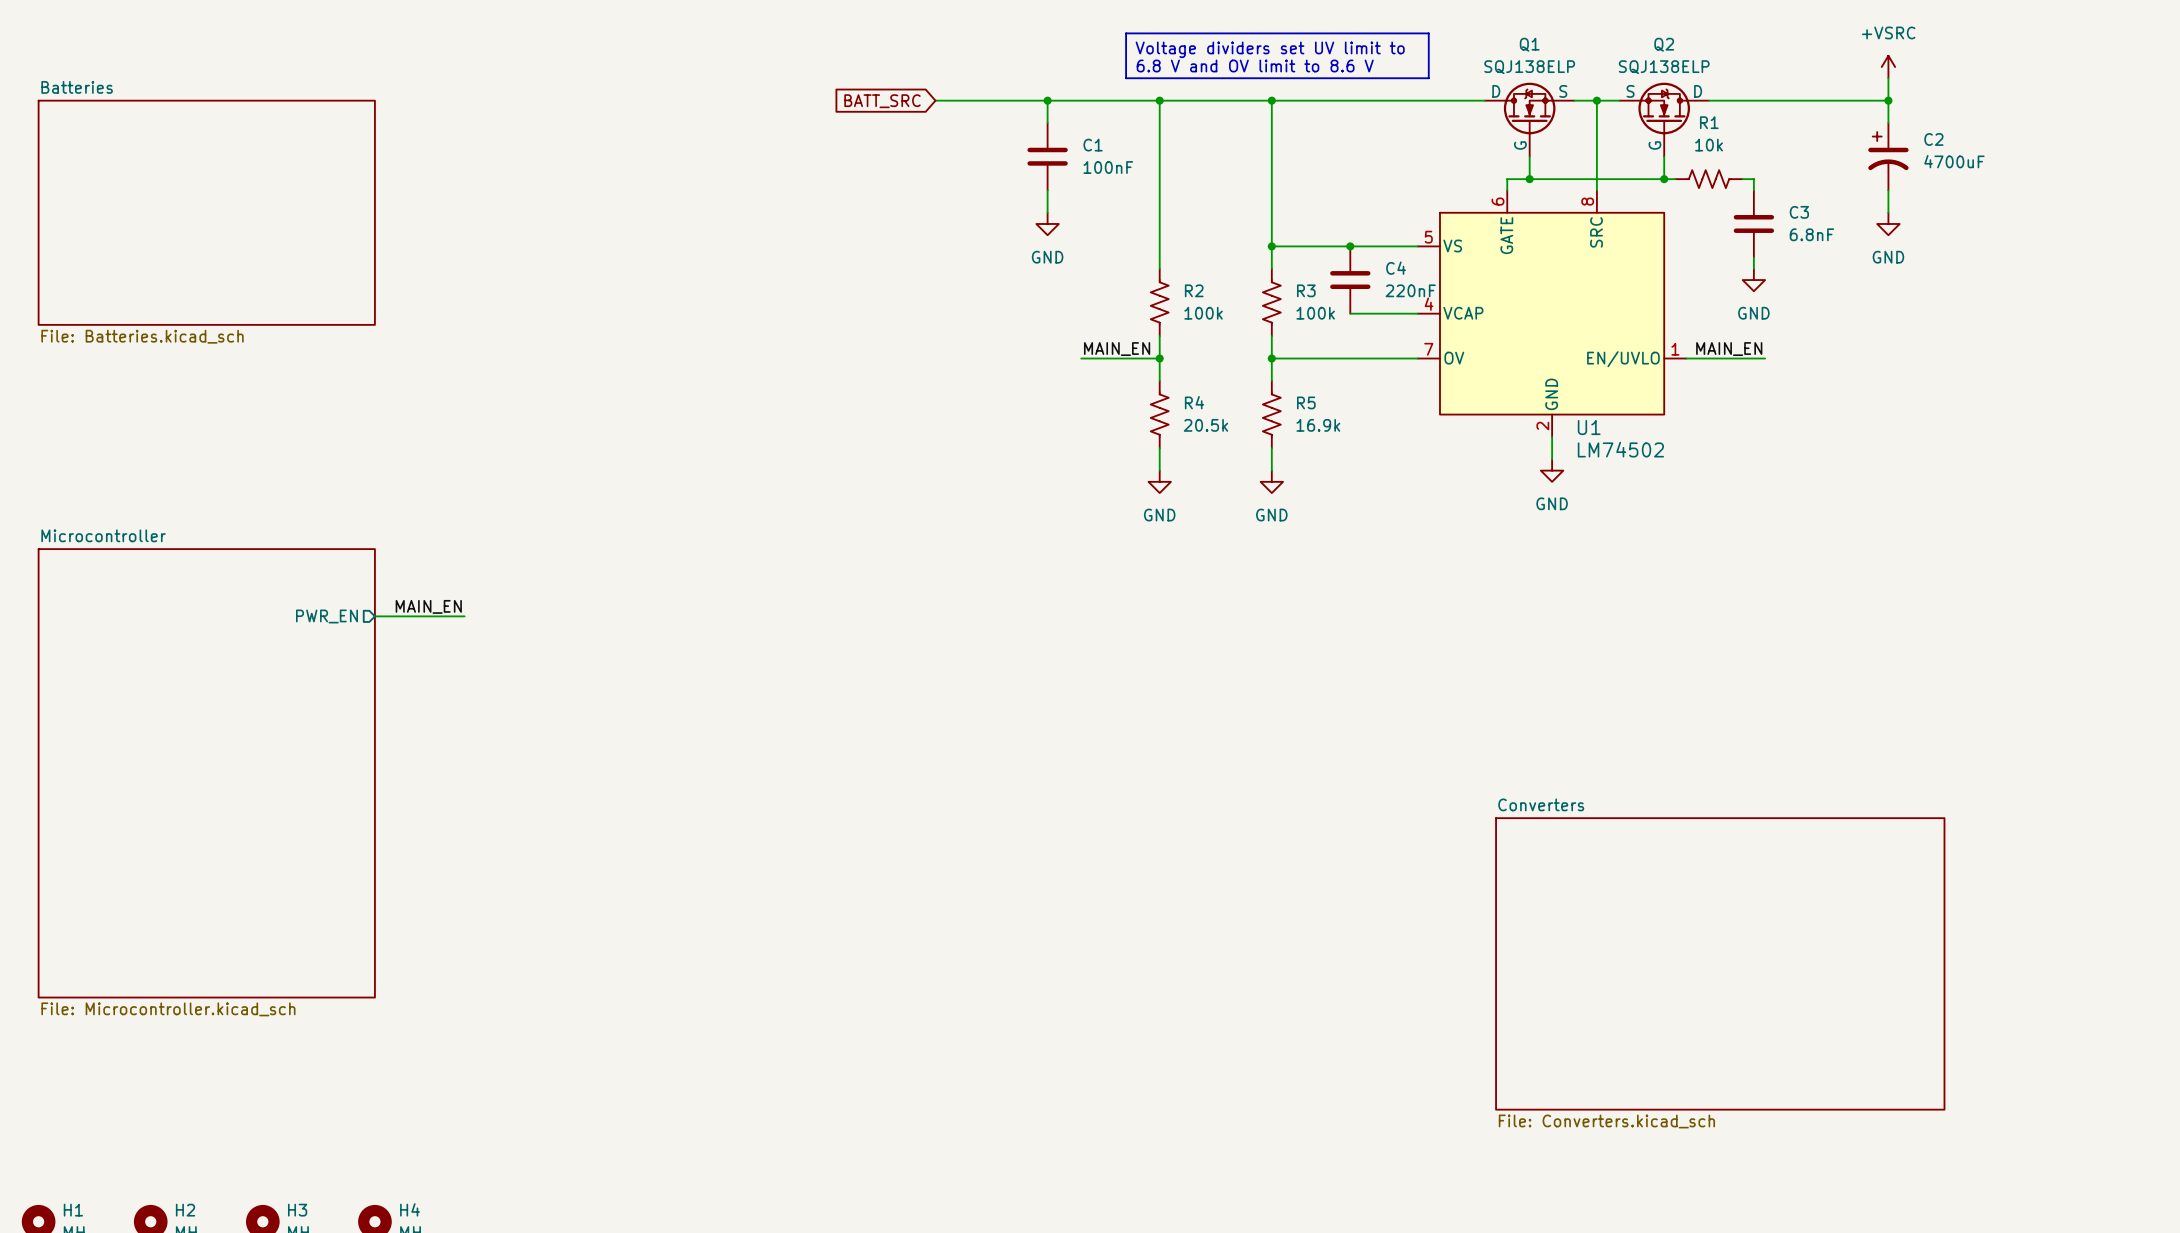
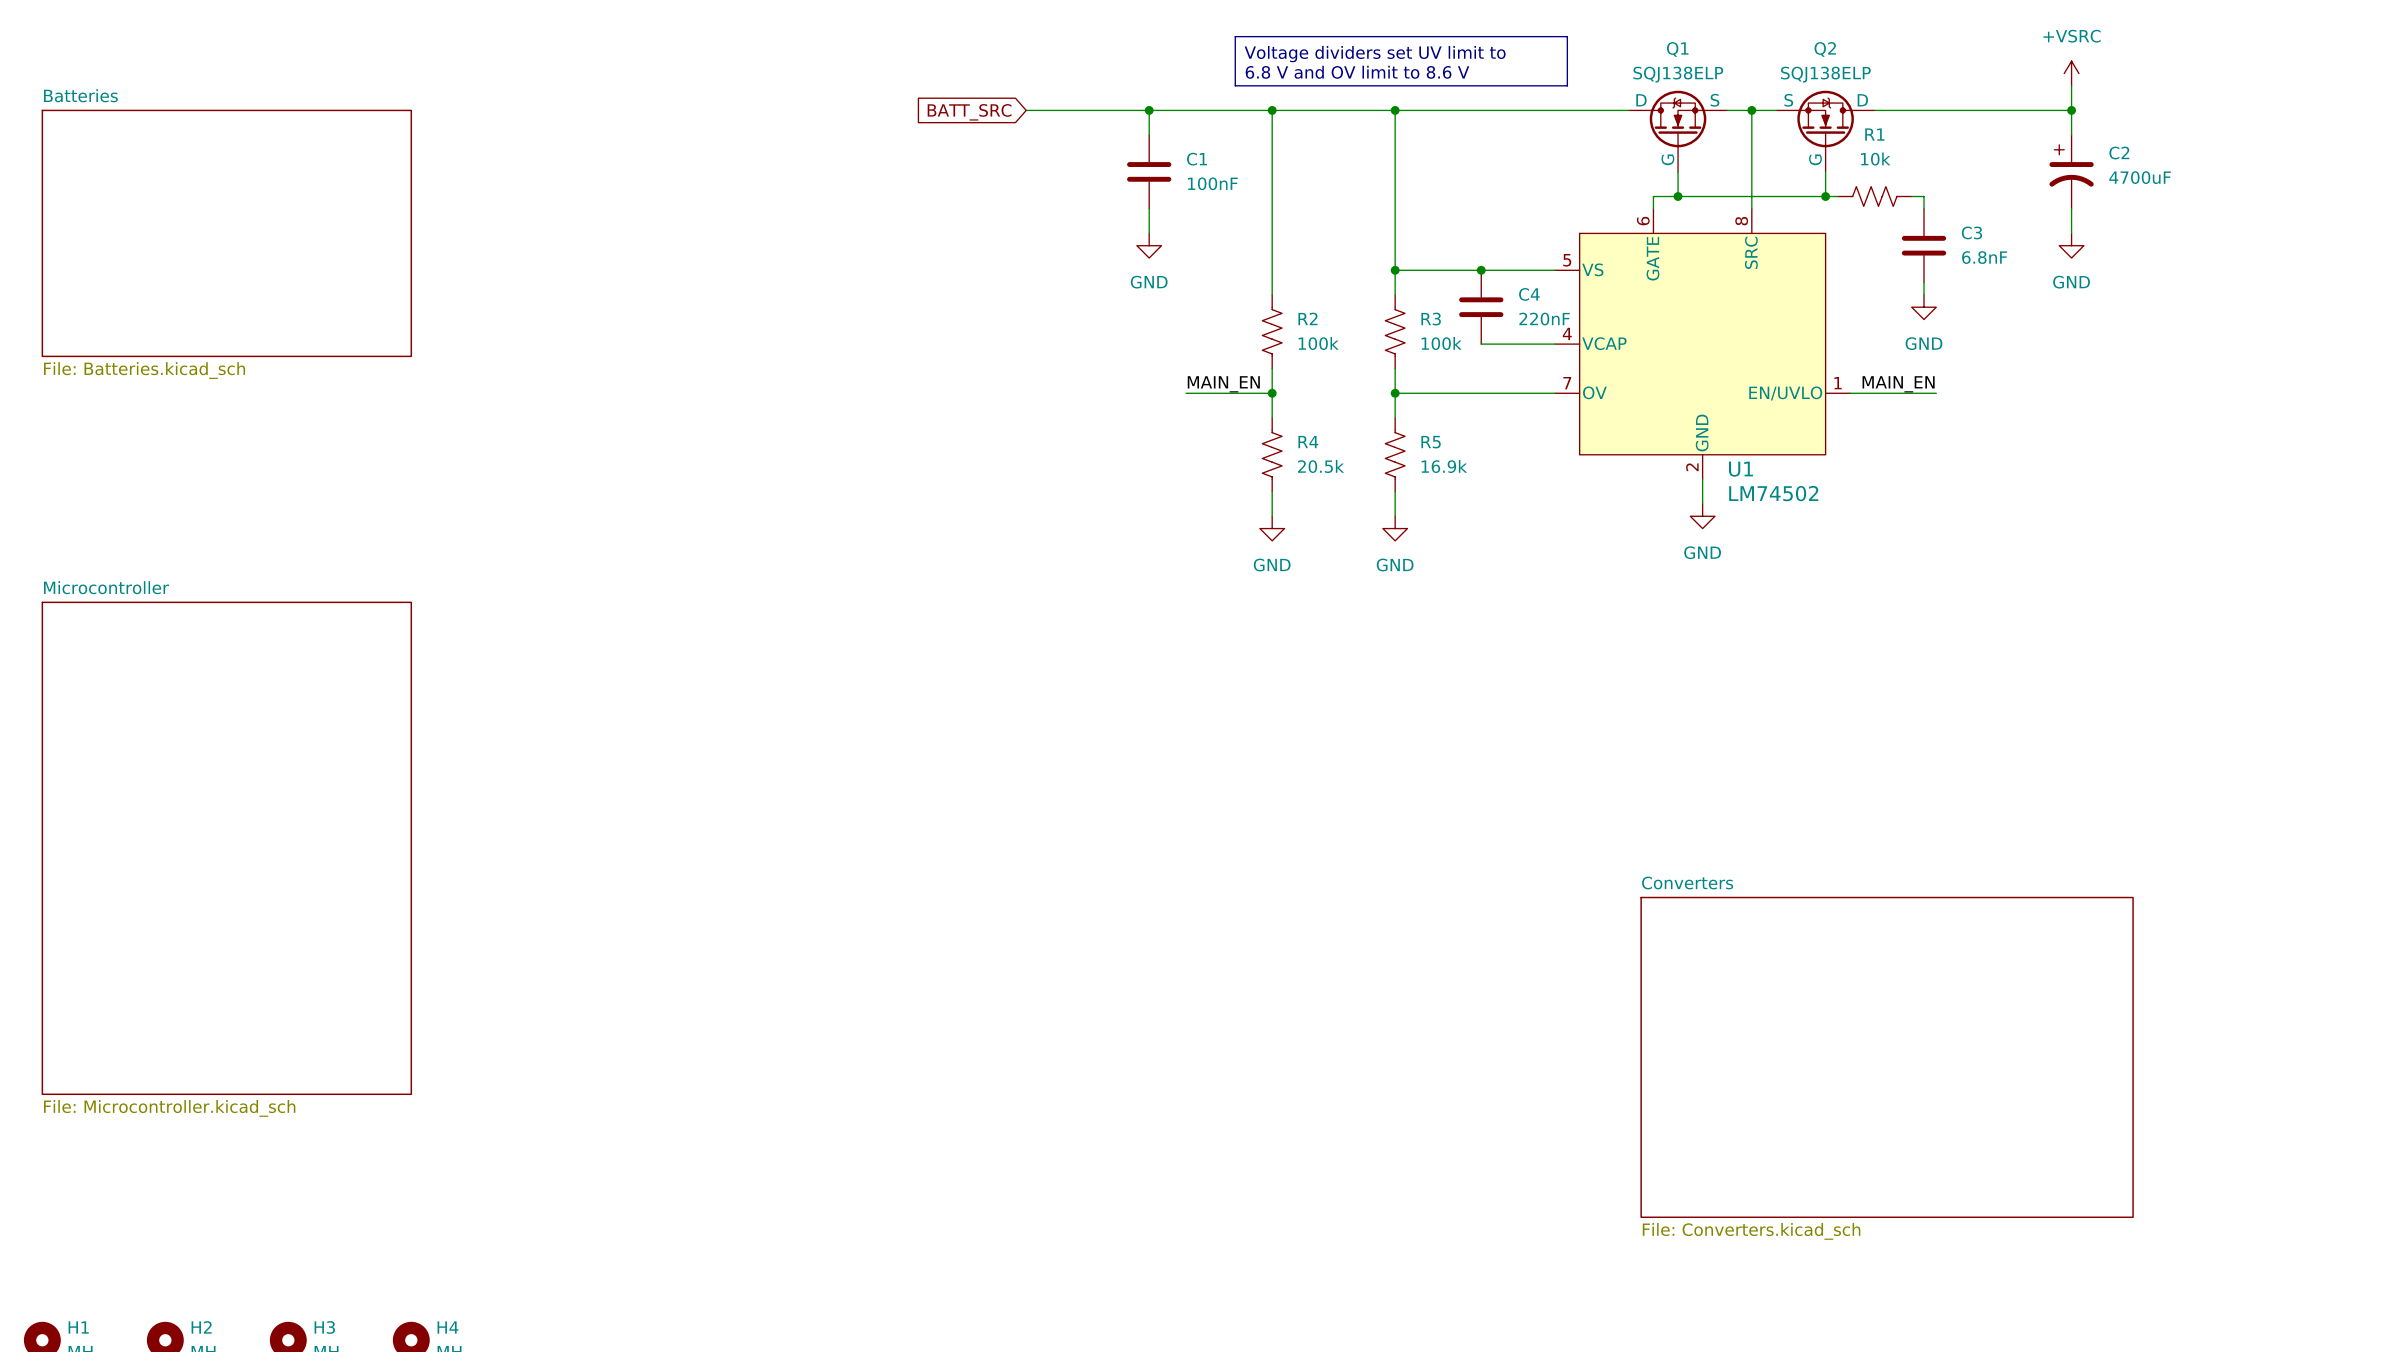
label: MAIN_EN (428, 606) -> none
sheet pin: PWR_EN (326, 616) -> none
wire: (374, 616) (464, 616) -> none

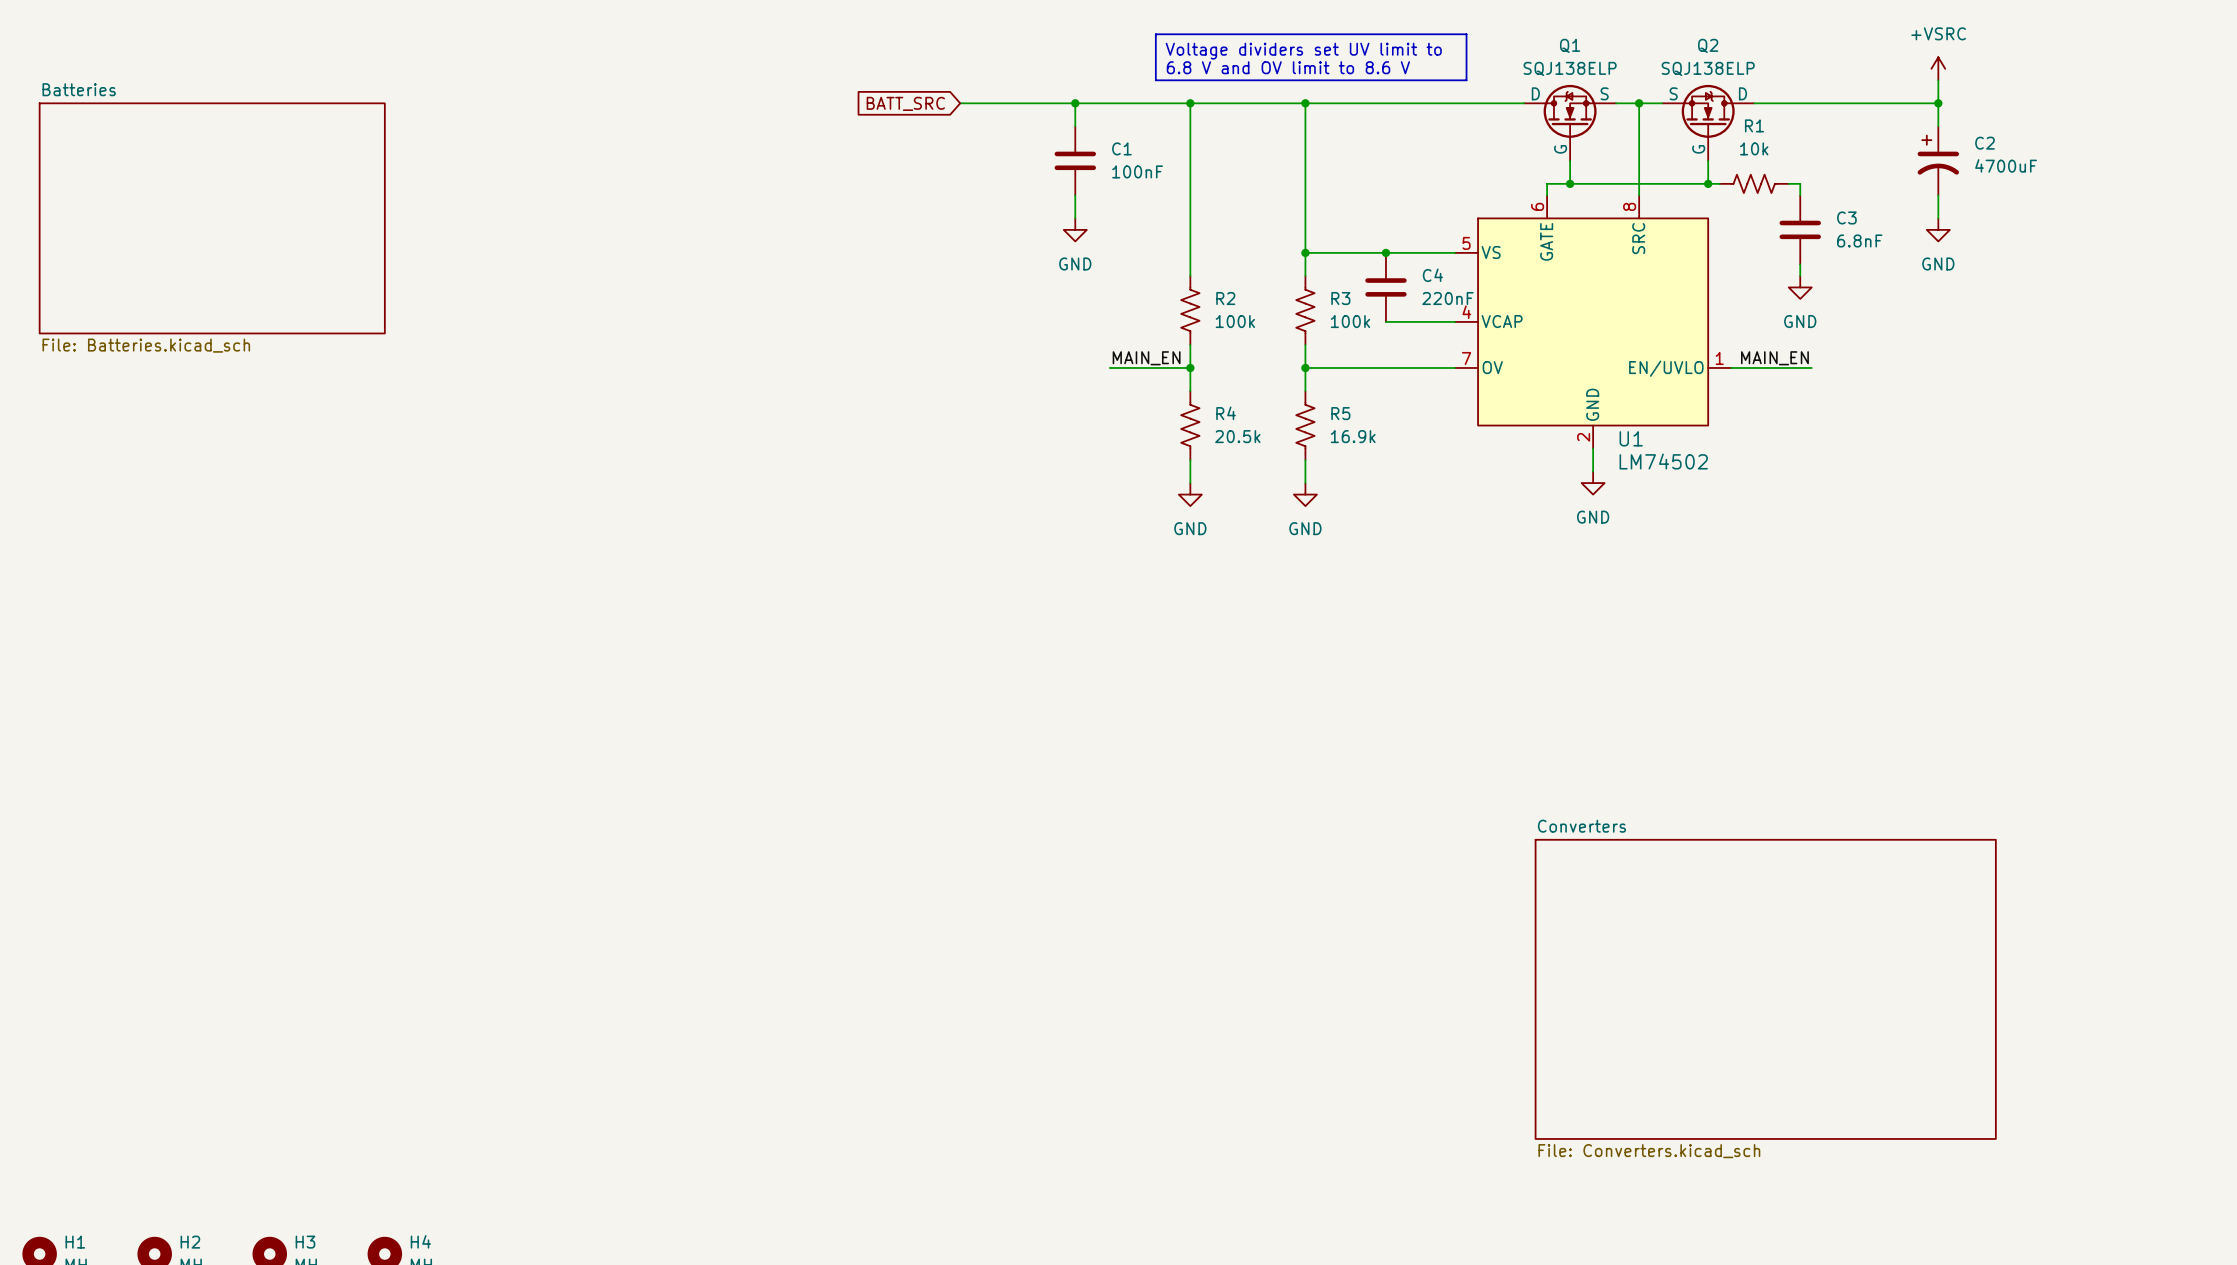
sheet Microcontroller: File: Microcontroller.kicad_sch (226, 848) -> none

